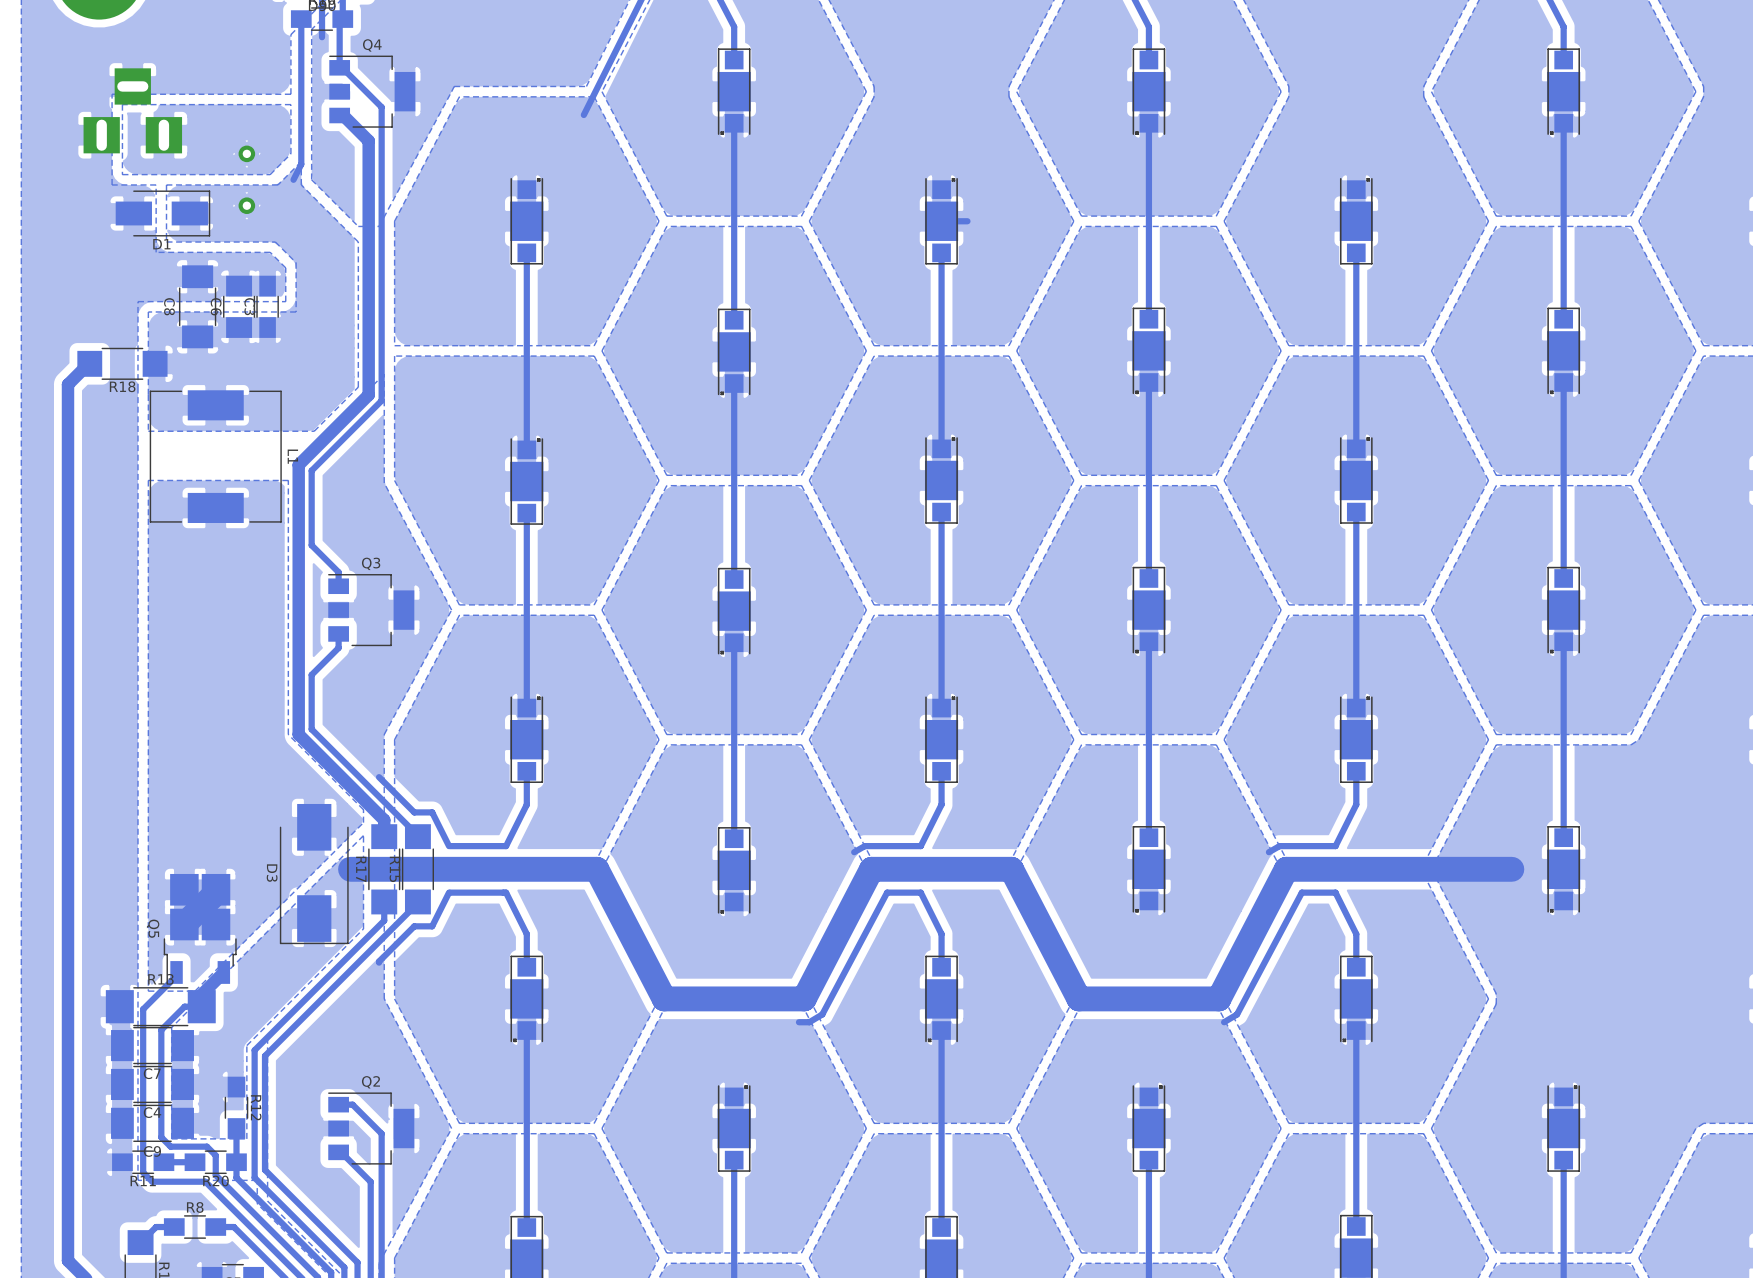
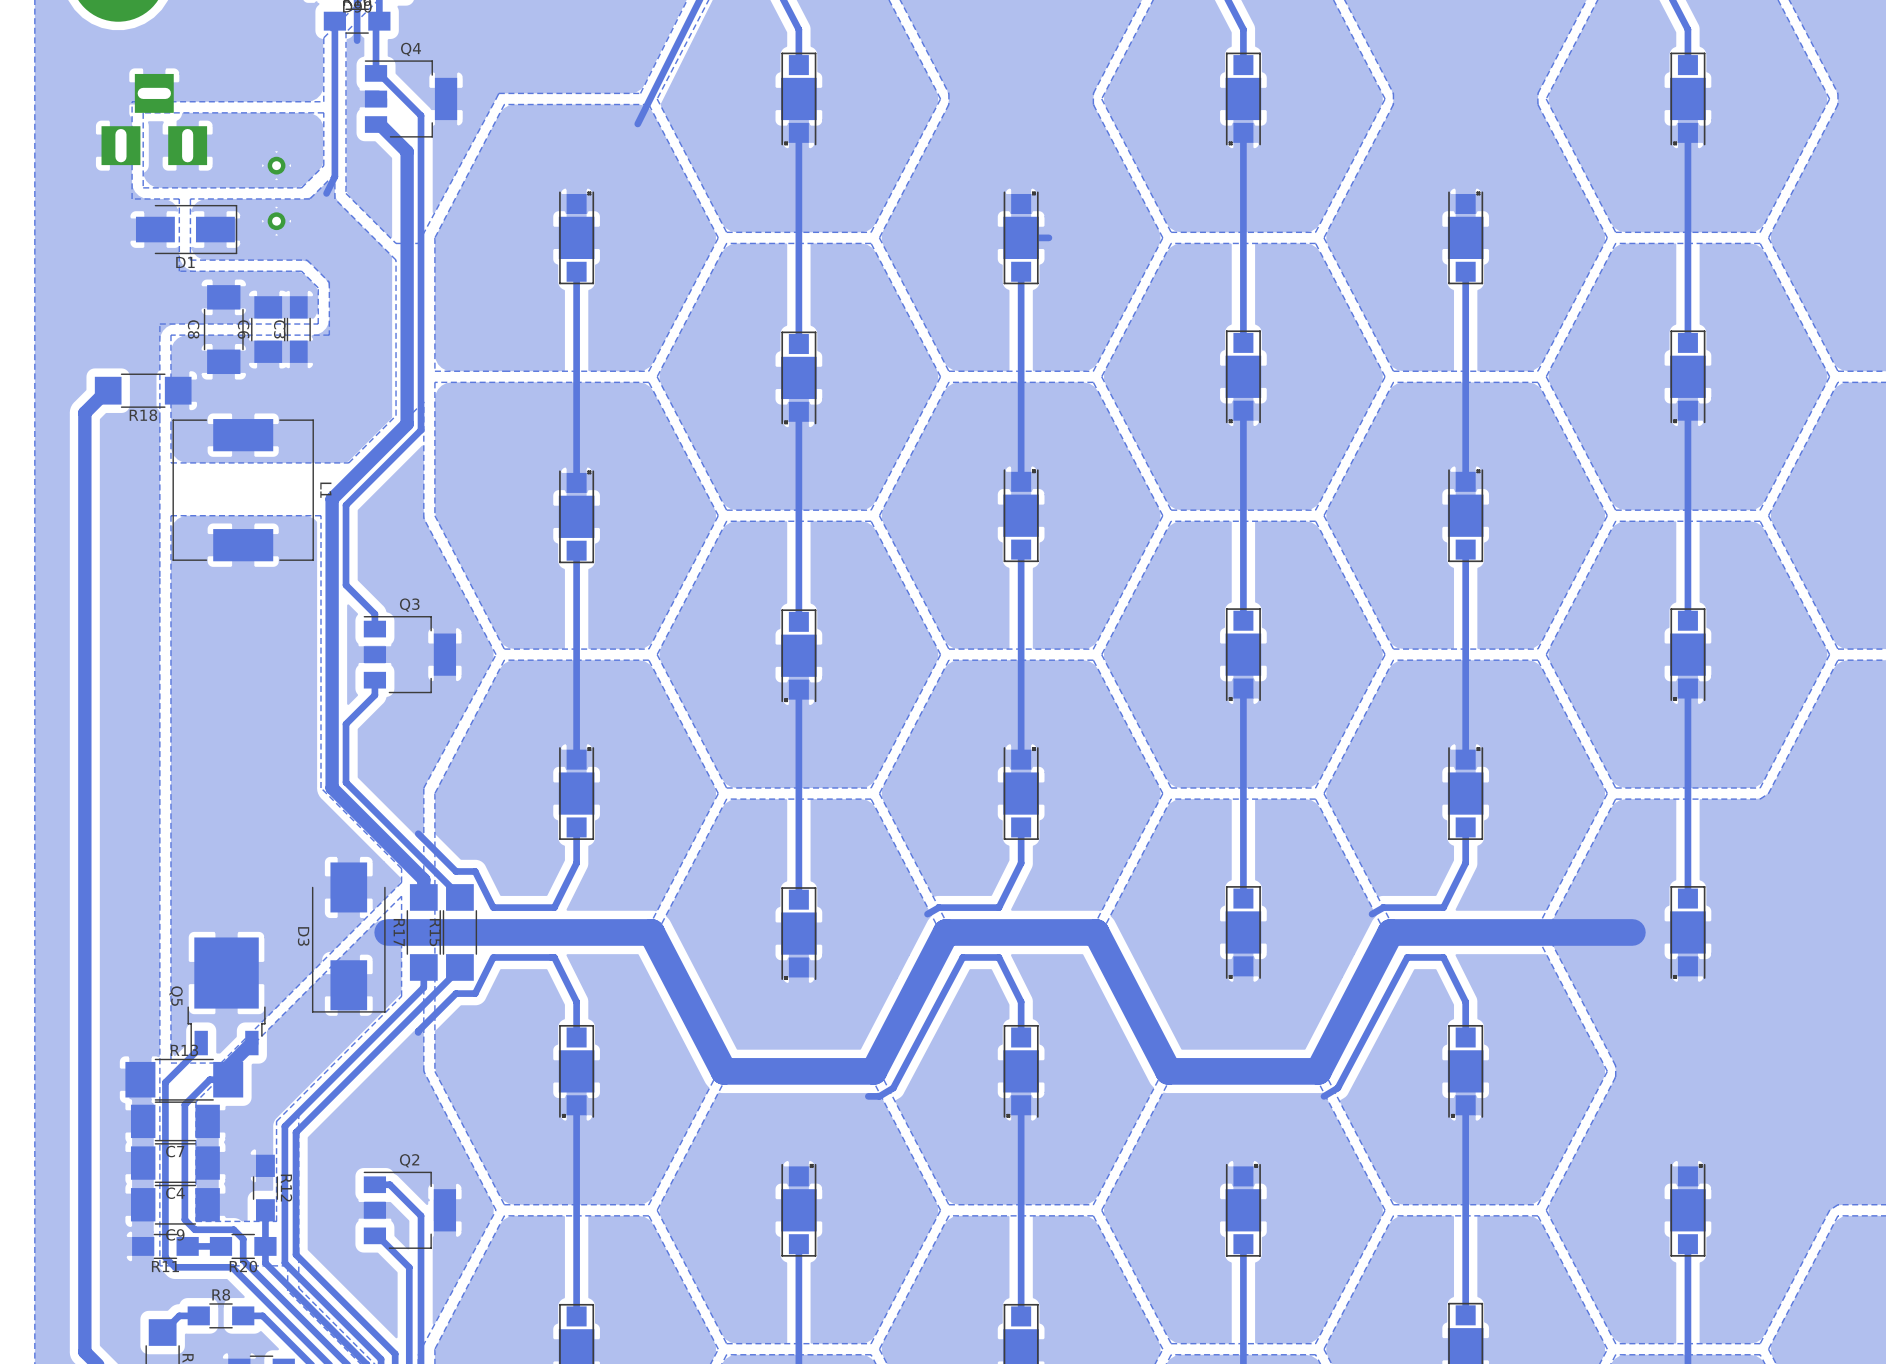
Q5 footprint: [163, 873, 237, 985] -> [187, 937, 266, 1056]

